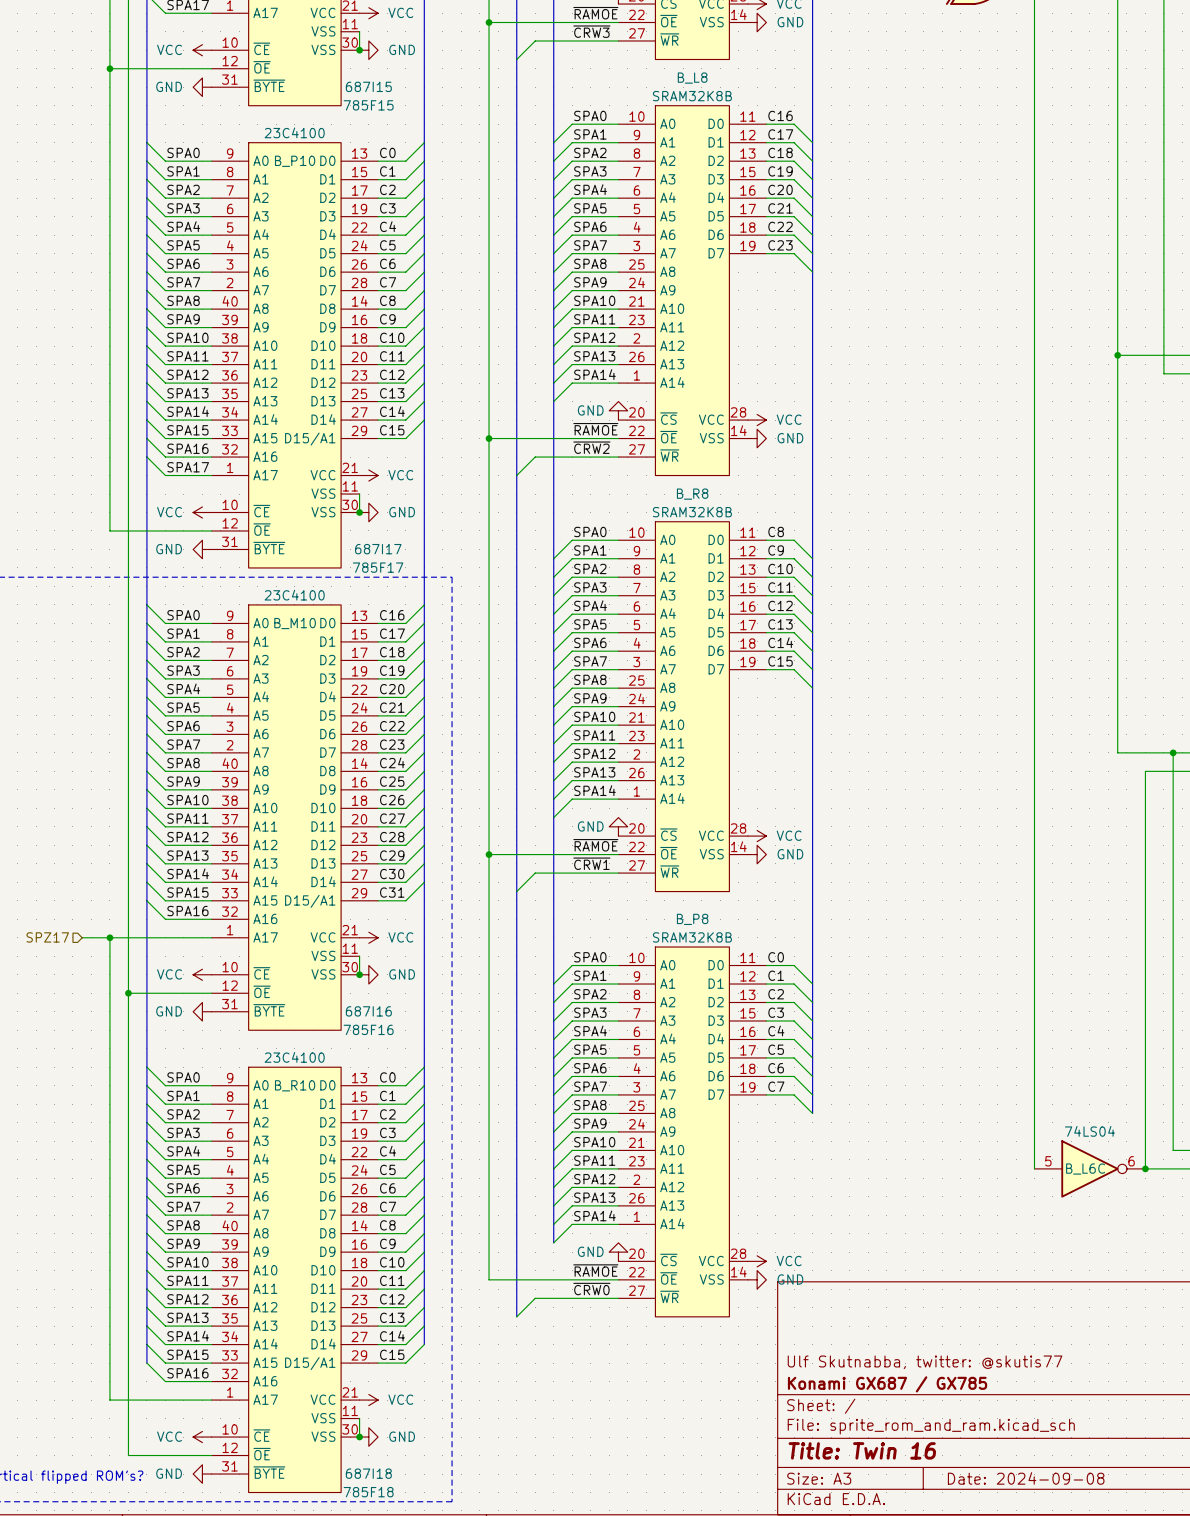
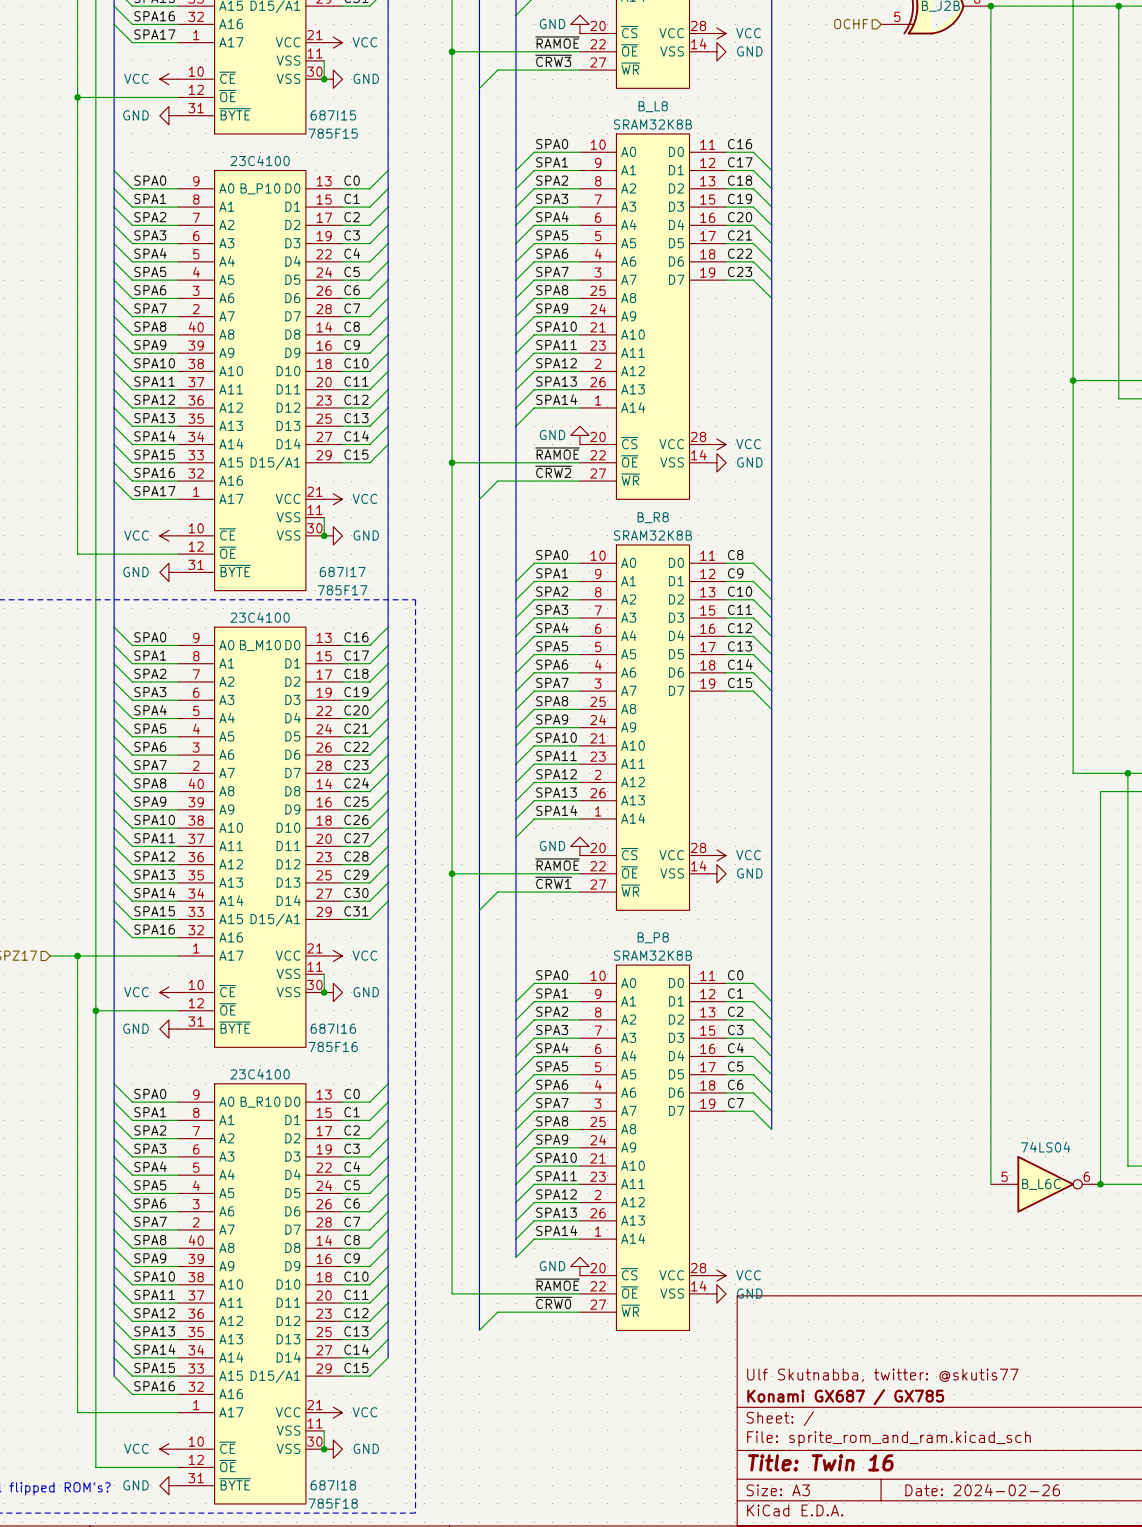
title block: Date: 2024-09-08 (1026, 1478) -> Date: 2024-02-26 (982, 1490)

